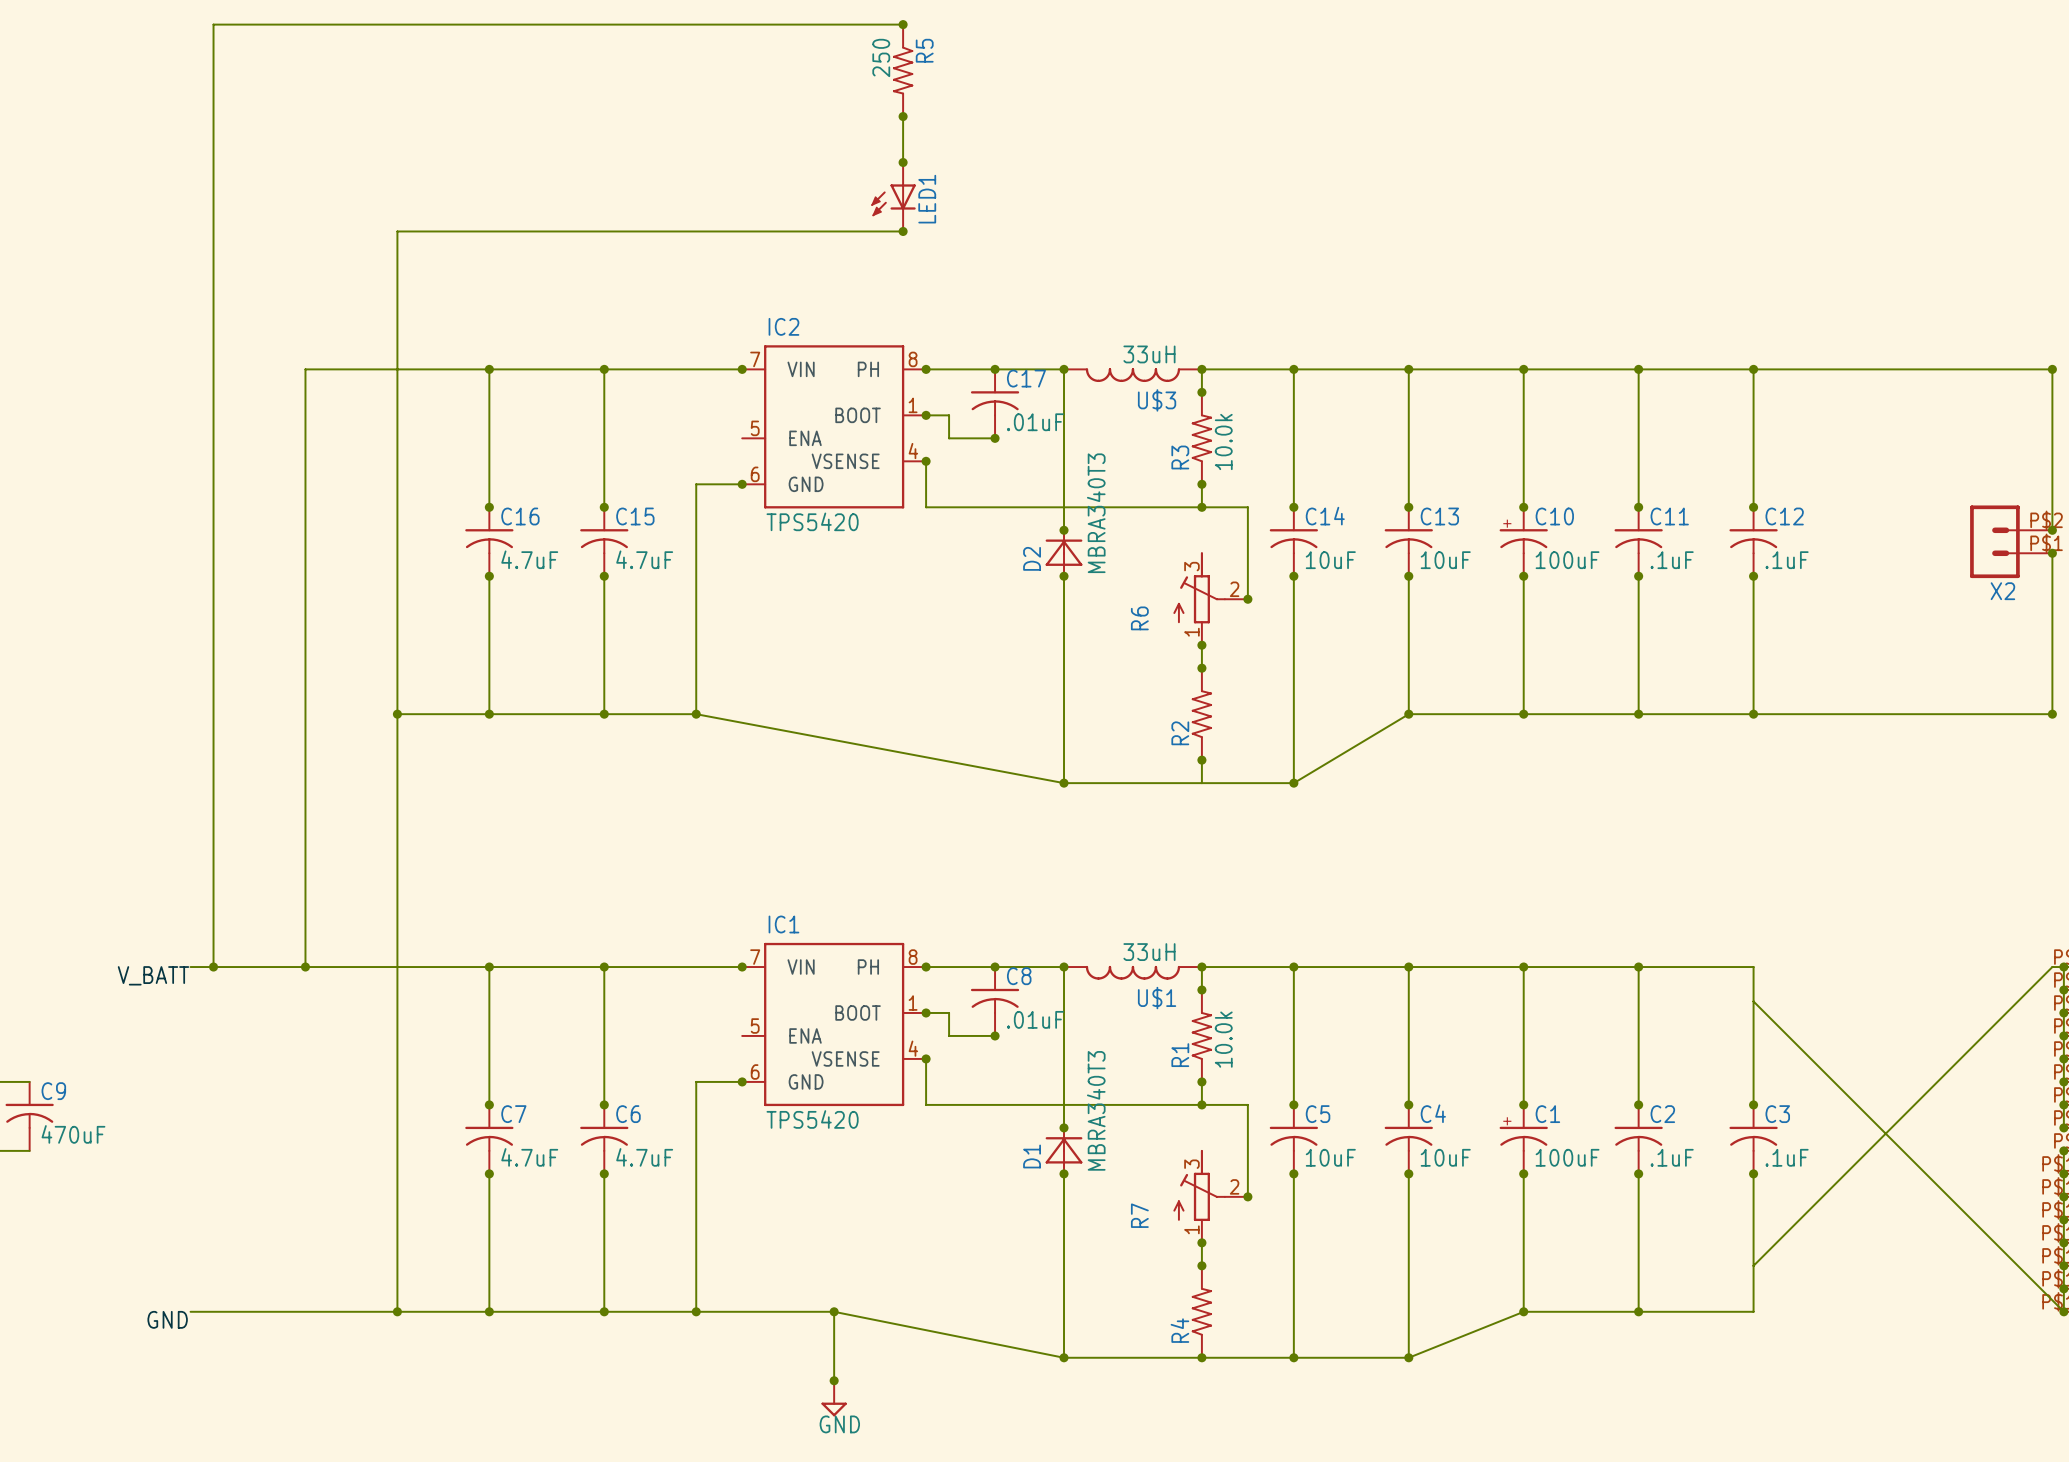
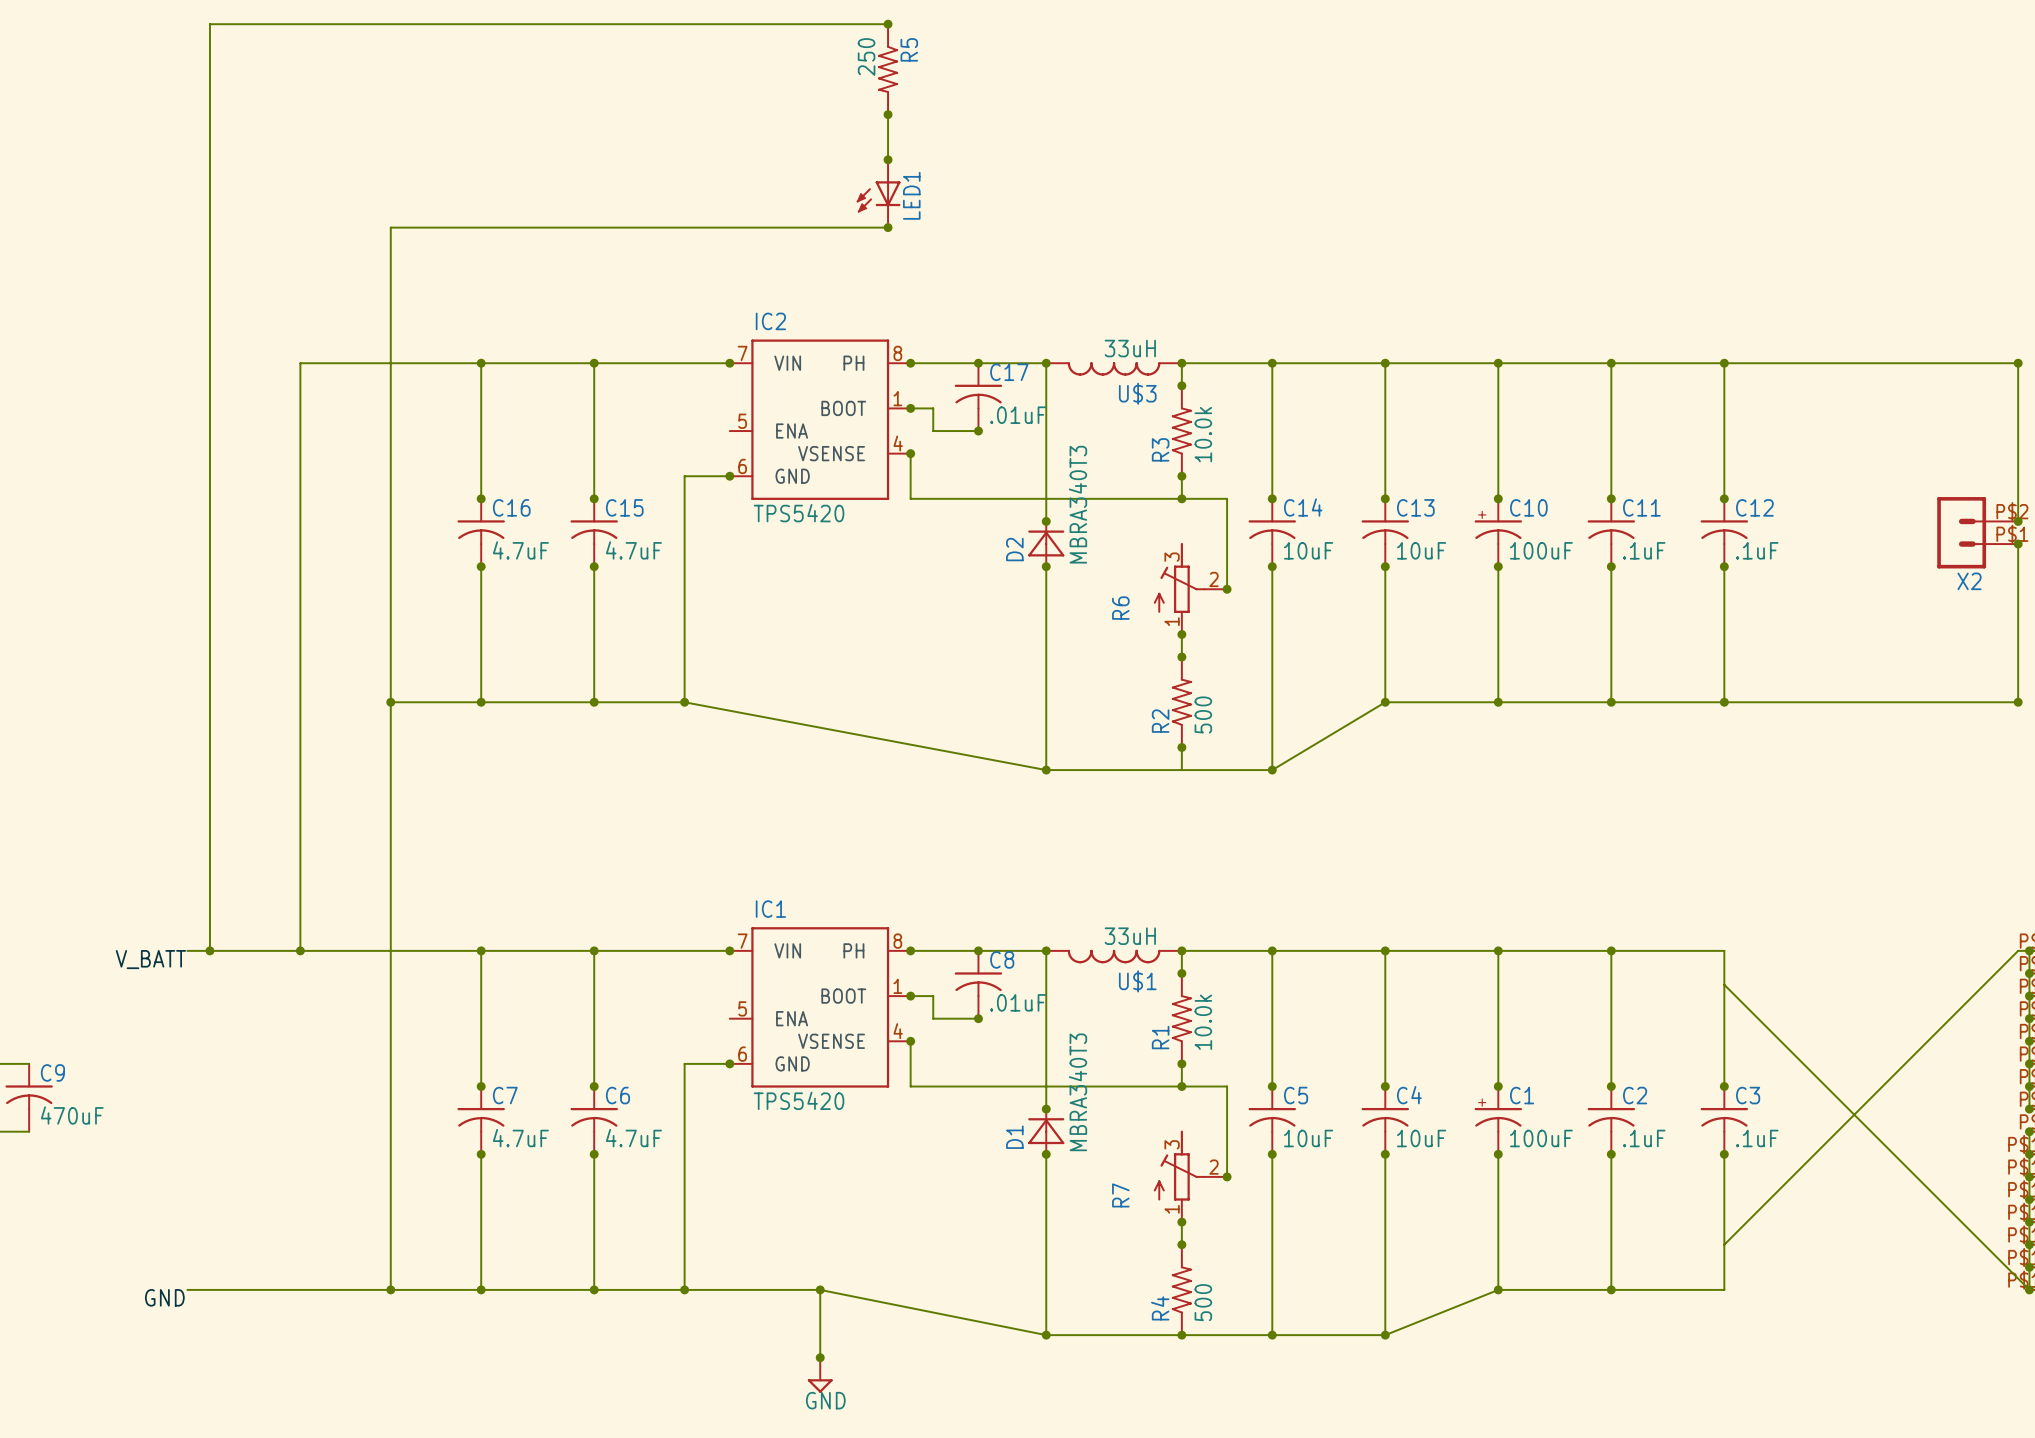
R2 value: none -> 500 (1203, 714)
R4 value: none -> 500 (1203, 1302)

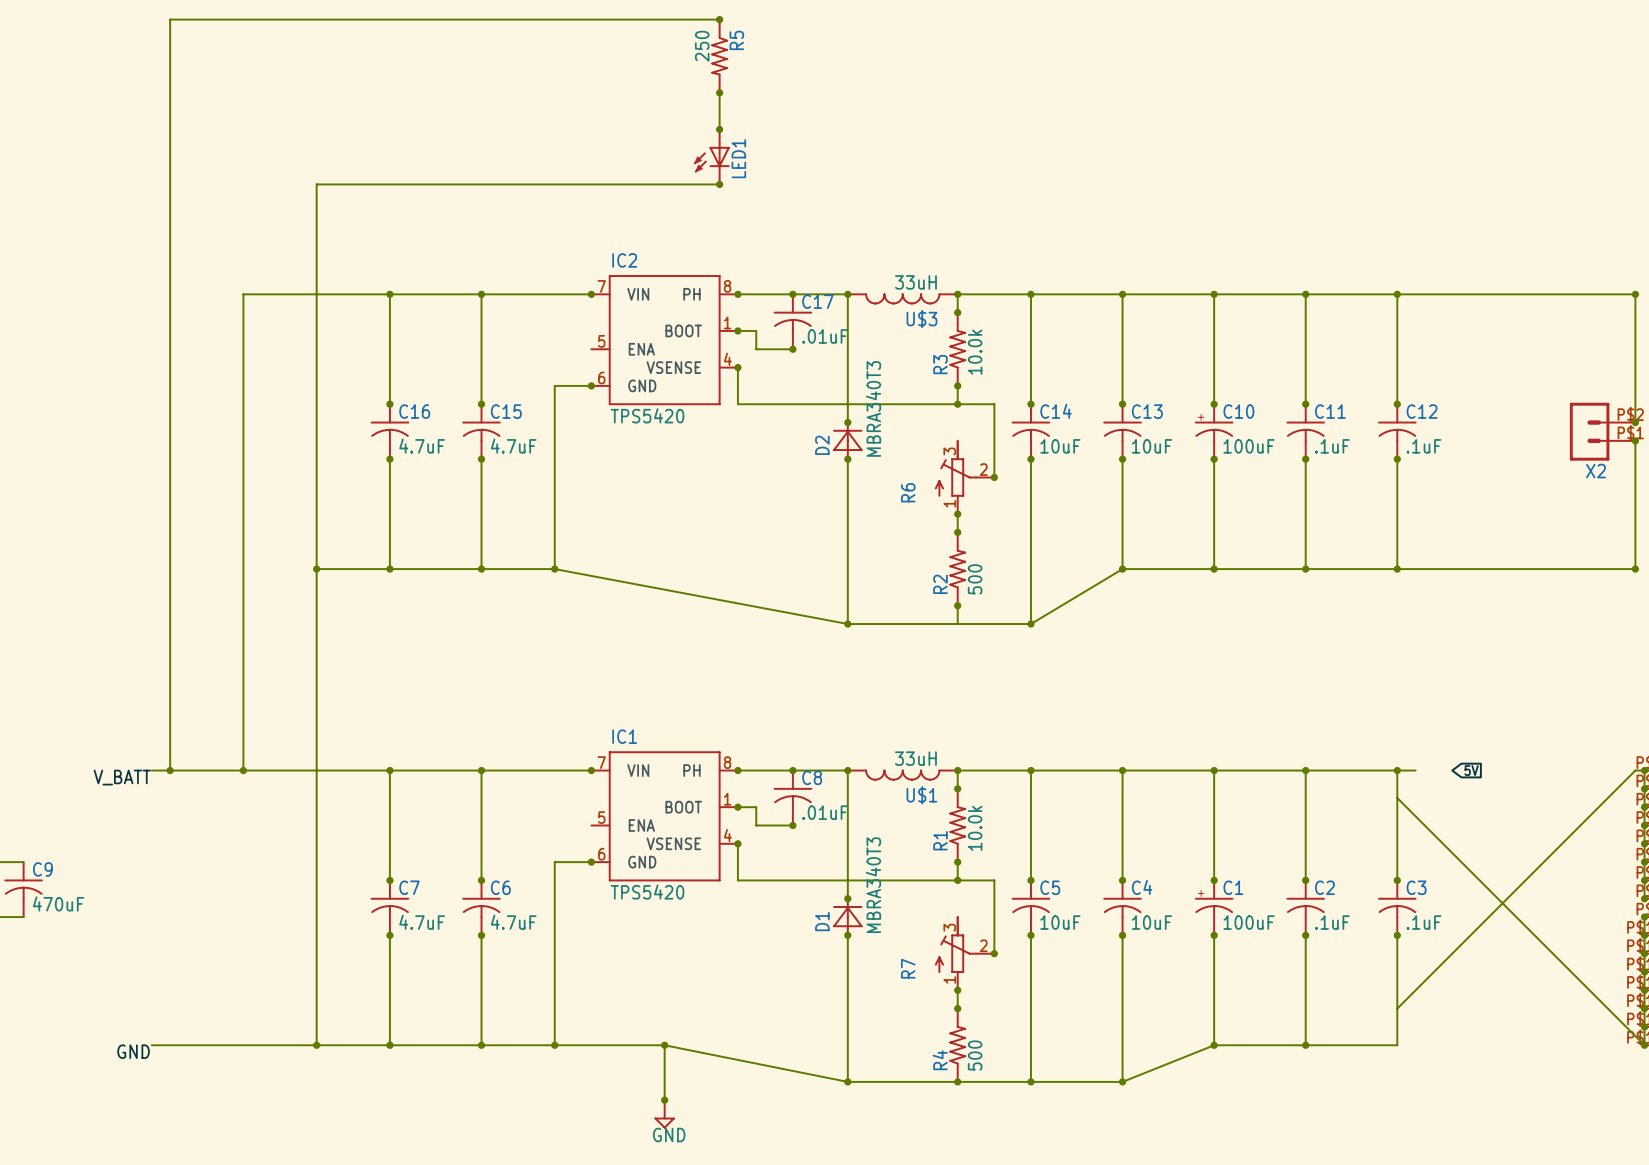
wire: none -> (1397, 770) (1415, 770)
junction: none -> (1397, 770)
global label: none -> 5V (1471, 770)

